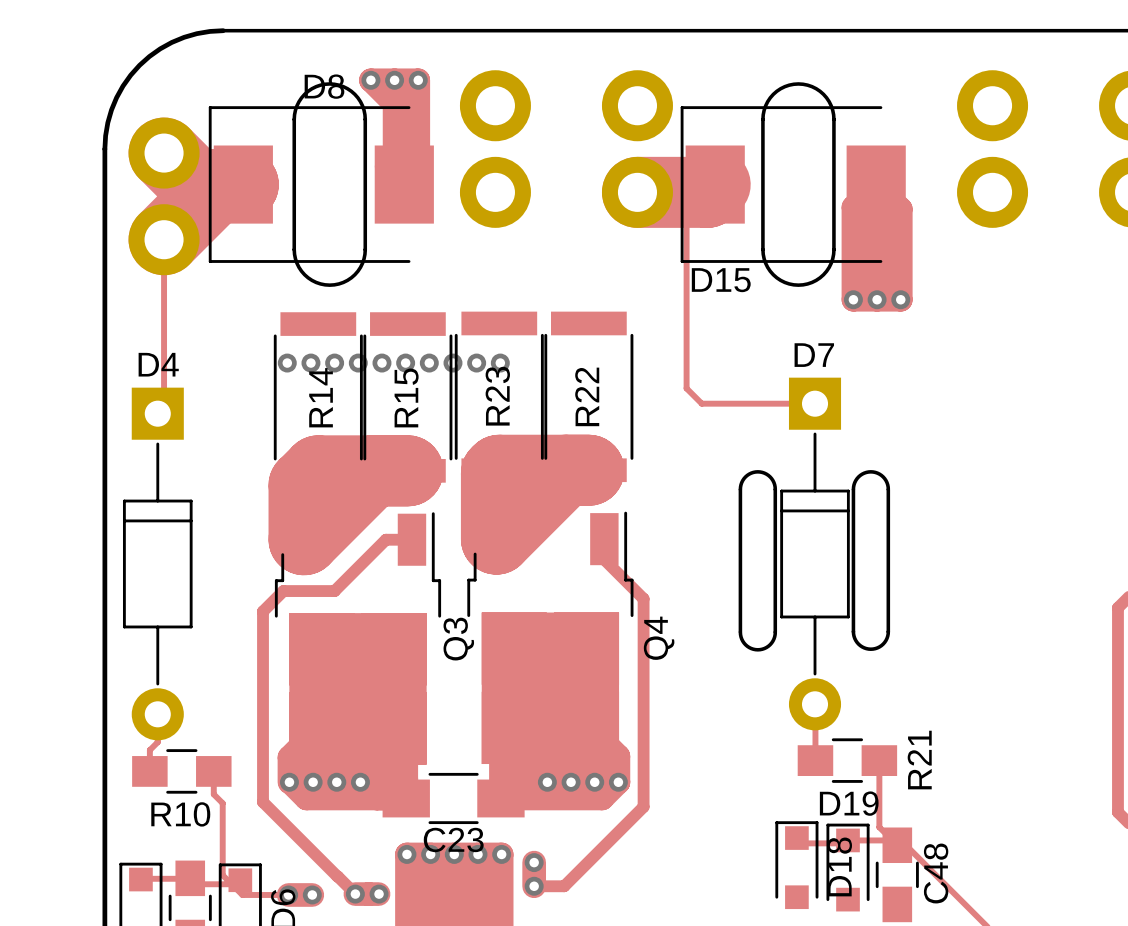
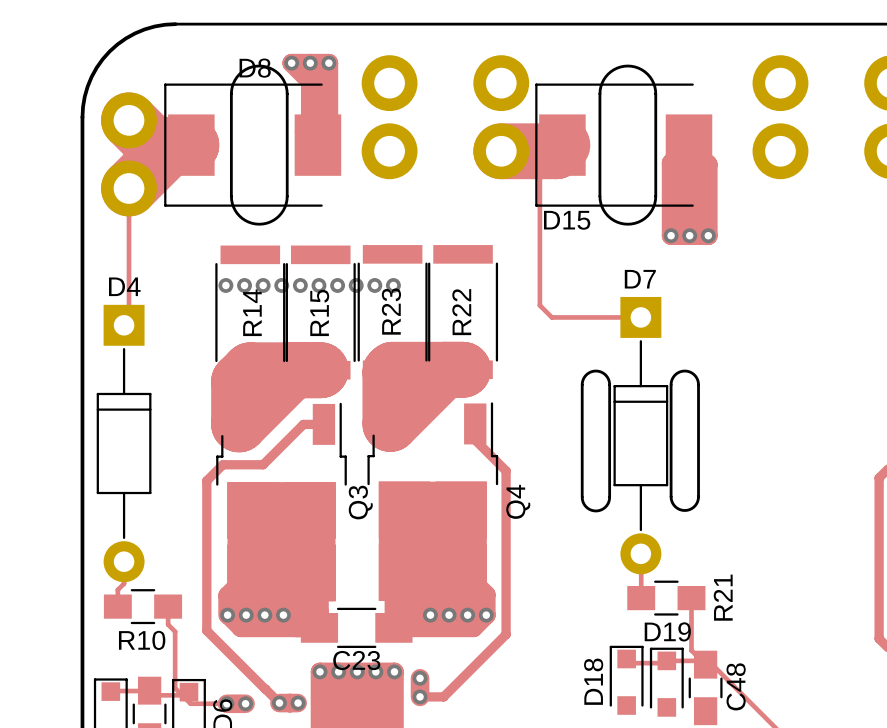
D18 name position: D18 (839, 866) -> D18 (593, 681)

